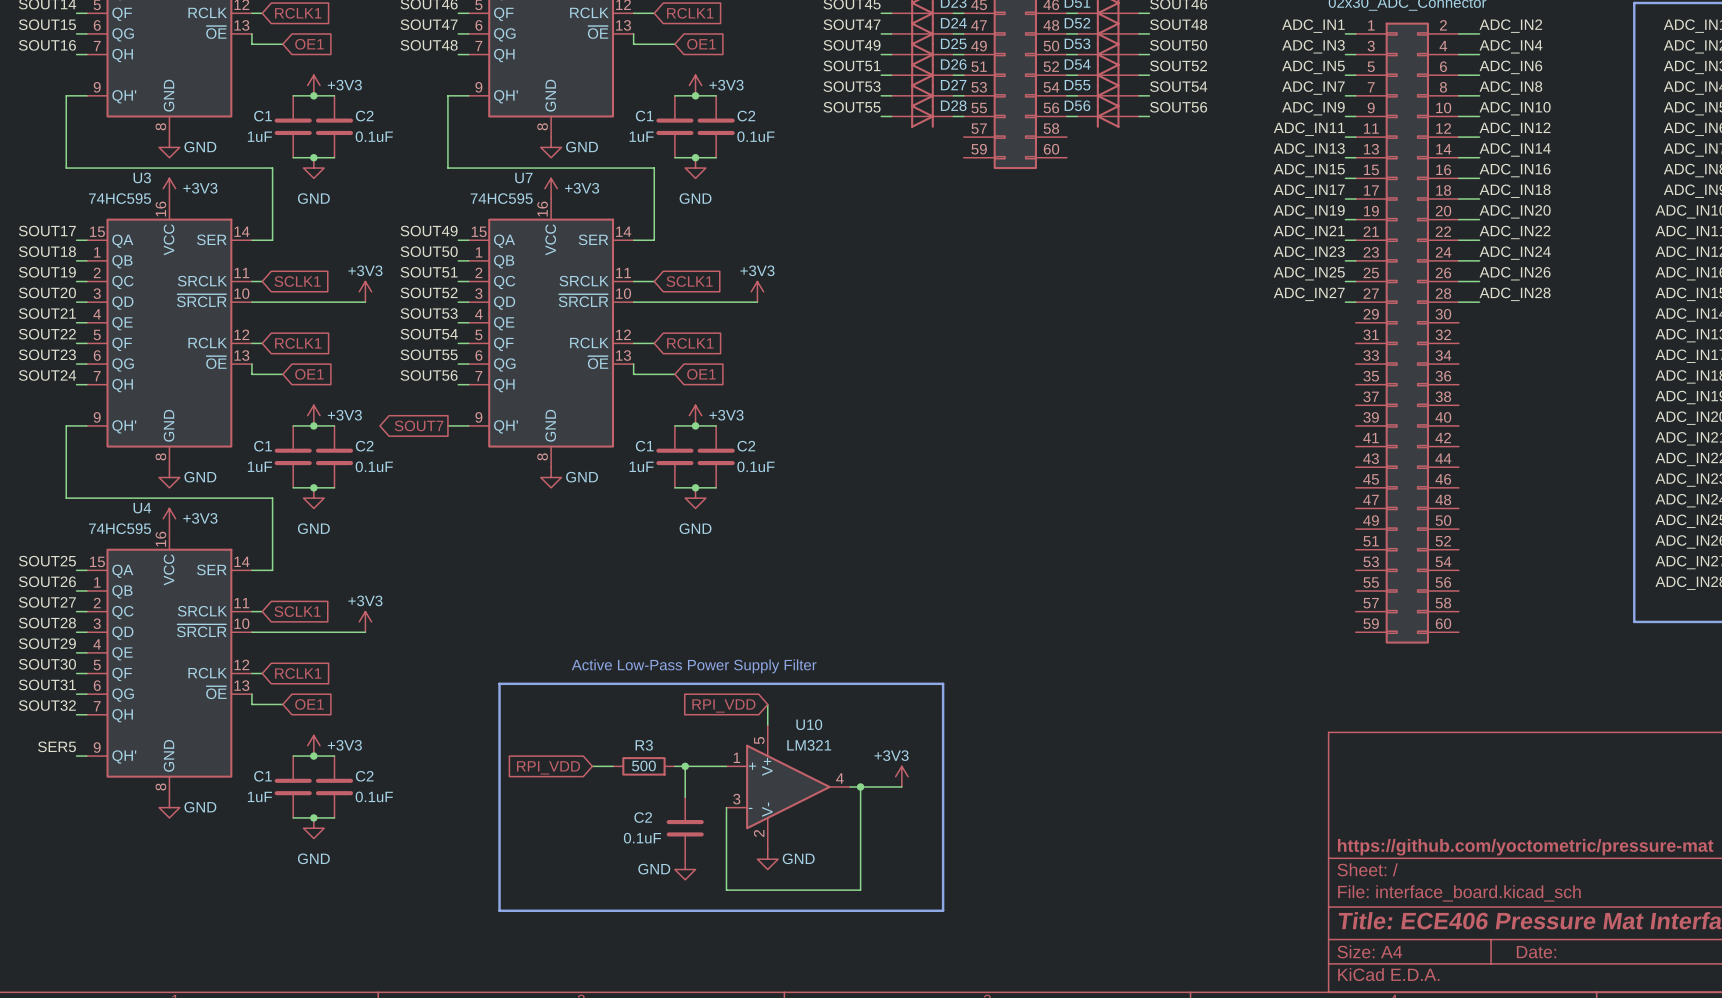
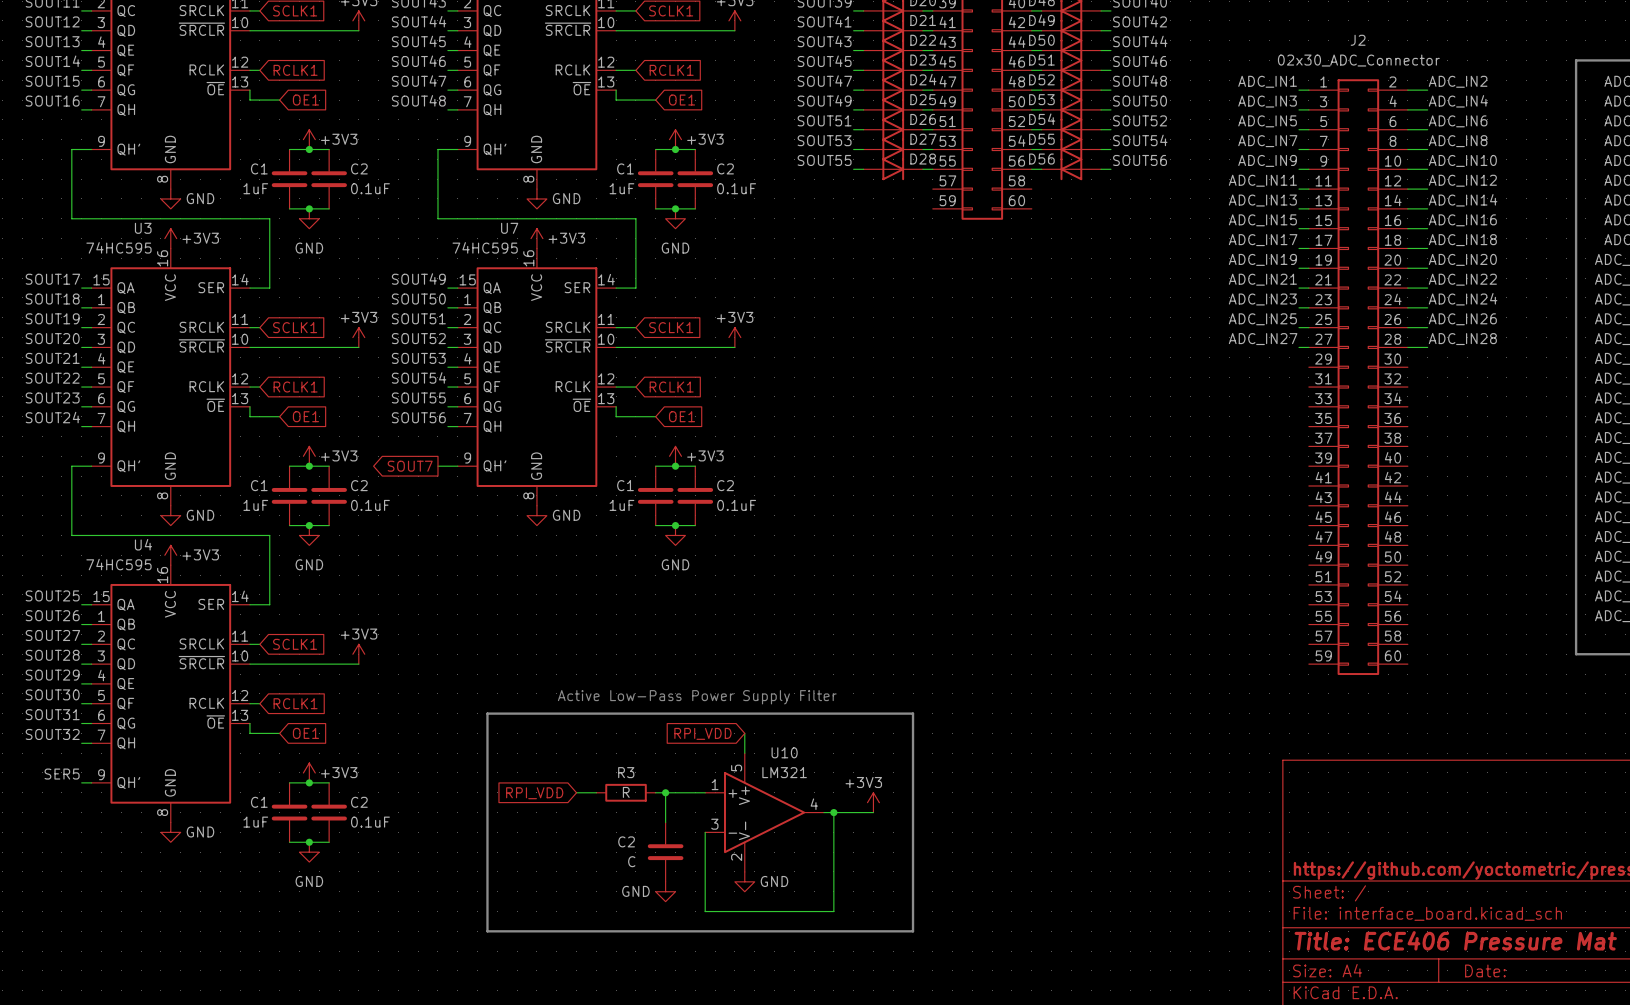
R3 value: 500 (643, 765) -> R (626, 792)
C2 value: 0.1uF (642, 838) -> C (631, 861)

